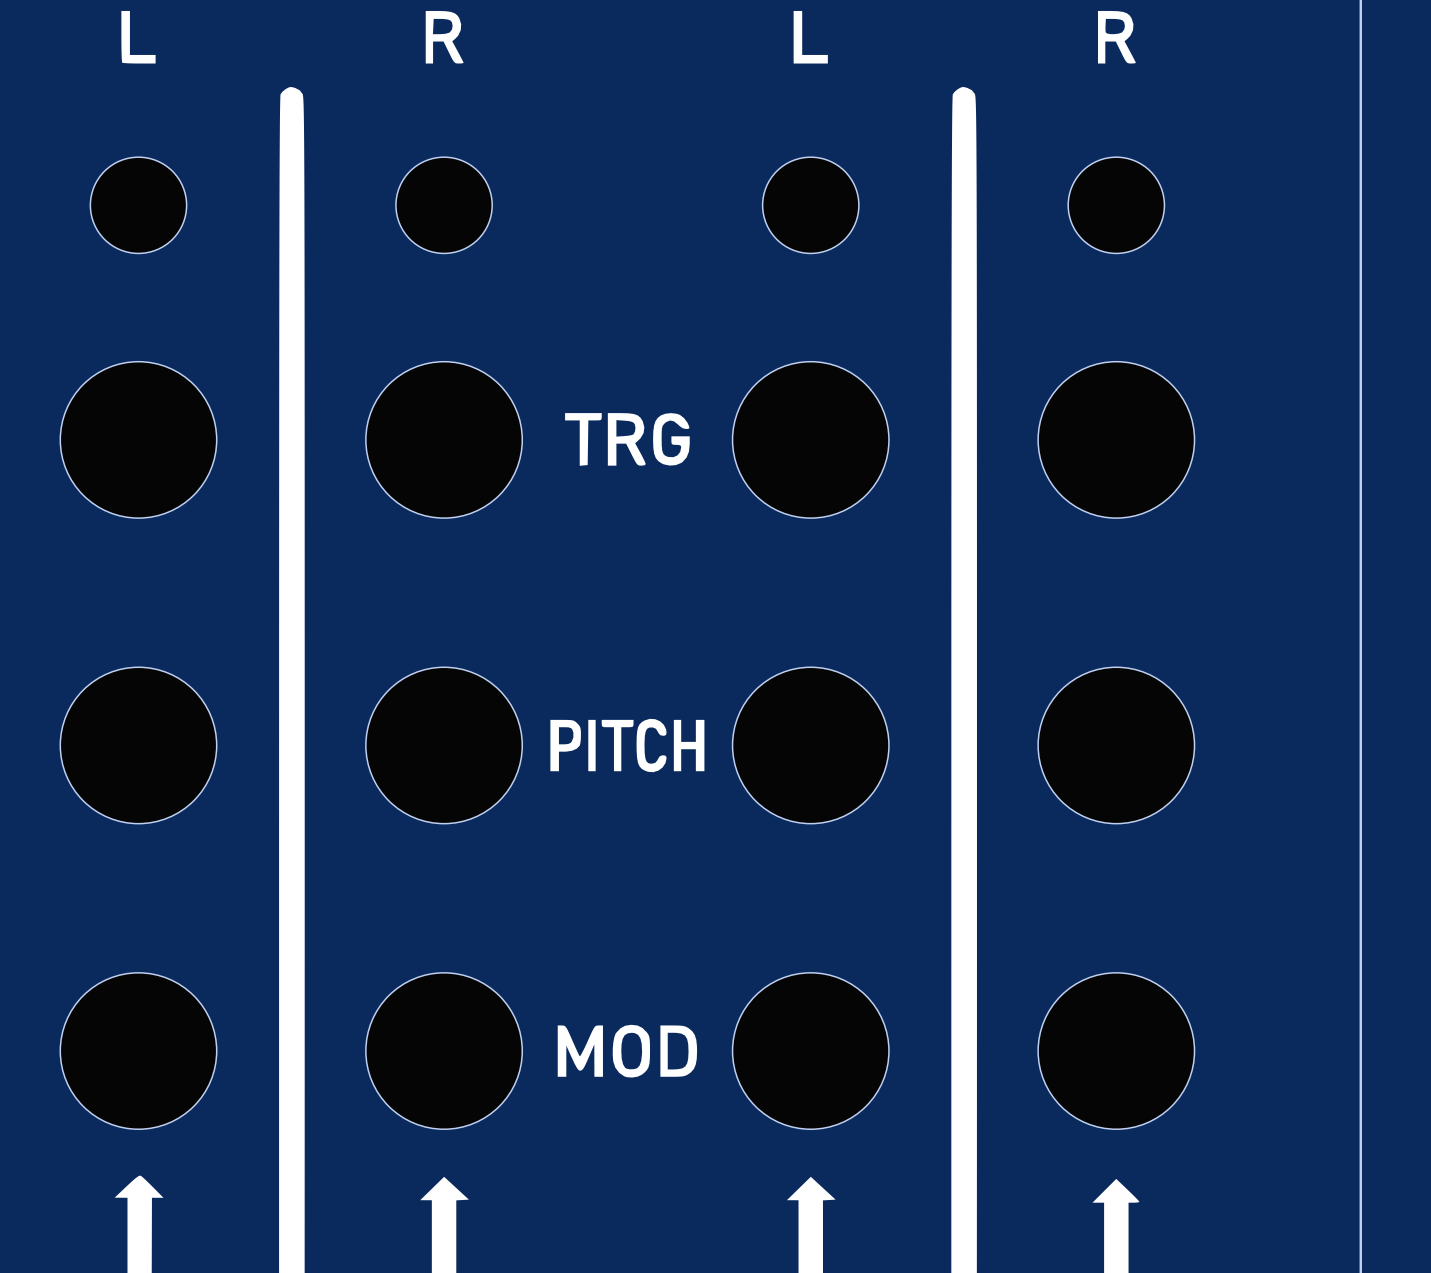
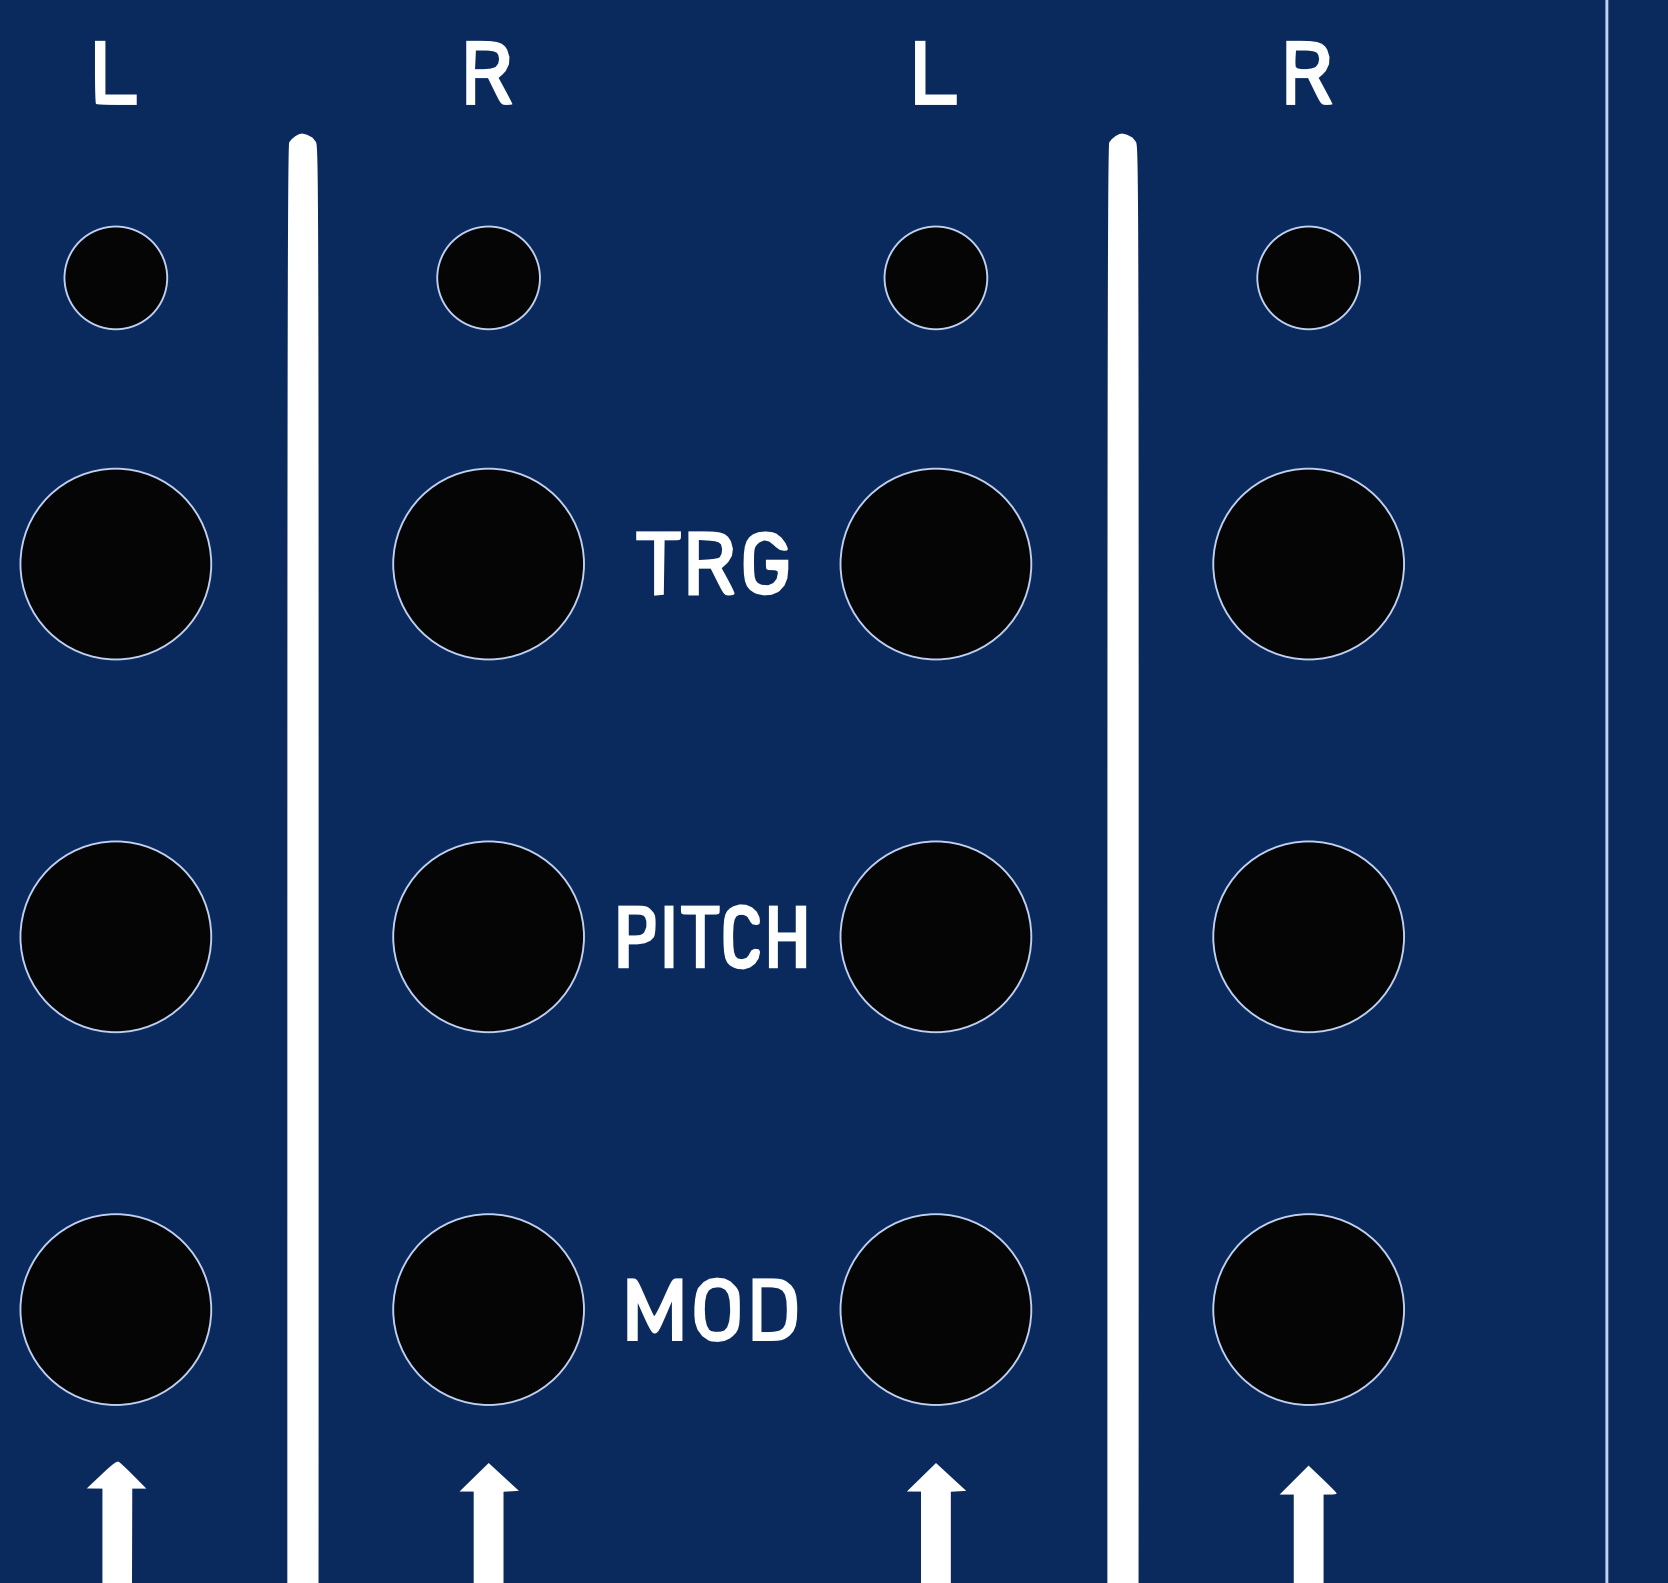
part footprint: [90, 157, 187, 254] -> [64, 226, 168, 330]
part footprint: [395, 157, 493, 254] -> [437, 226, 540, 330]
part footprint: [762, 157, 859, 254] -> [884, 226, 988, 330]
part footprint: [1068, 157, 1165, 254] -> [1257, 226, 1361, 330]

